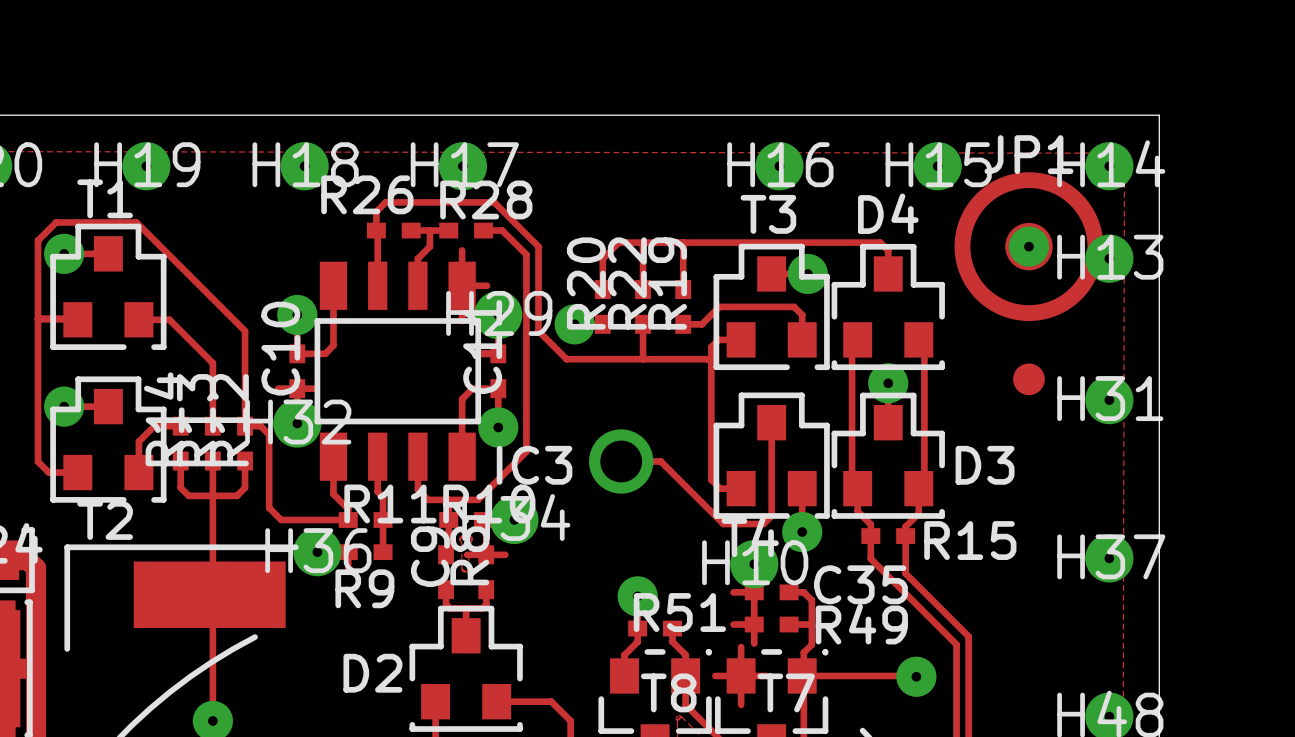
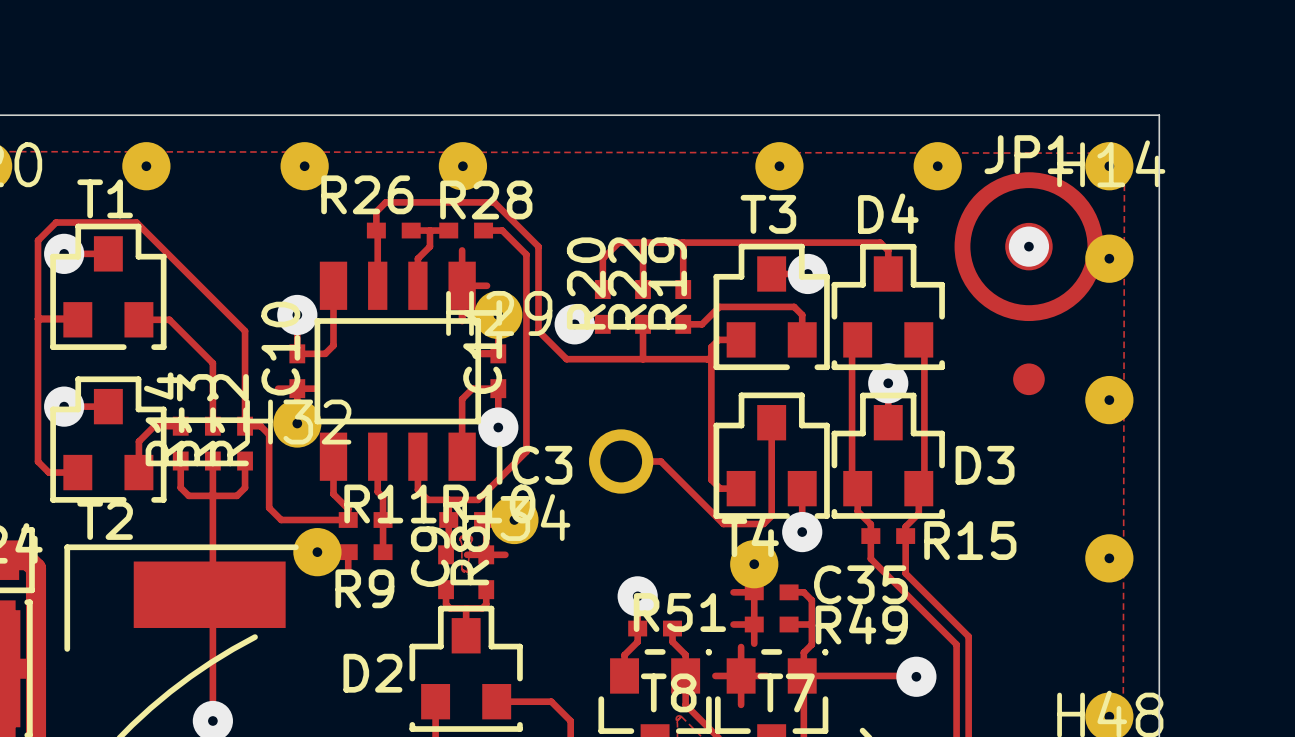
H19 name: H19 (147, 164) -> none
H18 name: H18 (305, 164) -> none
H17 name: H17 (464, 164) -> none
H16 name: H16 (780, 164) -> none
H15 name: H15 (938, 164) -> none
H13 name: H13 (1110, 257) -> none
H31 name: H31 (1110, 398) -> none
H36 name: H36 (318, 550) -> none
H37 name: H37 (1111, 556) -> none
H10 name: H10 (755, 562) -> none

